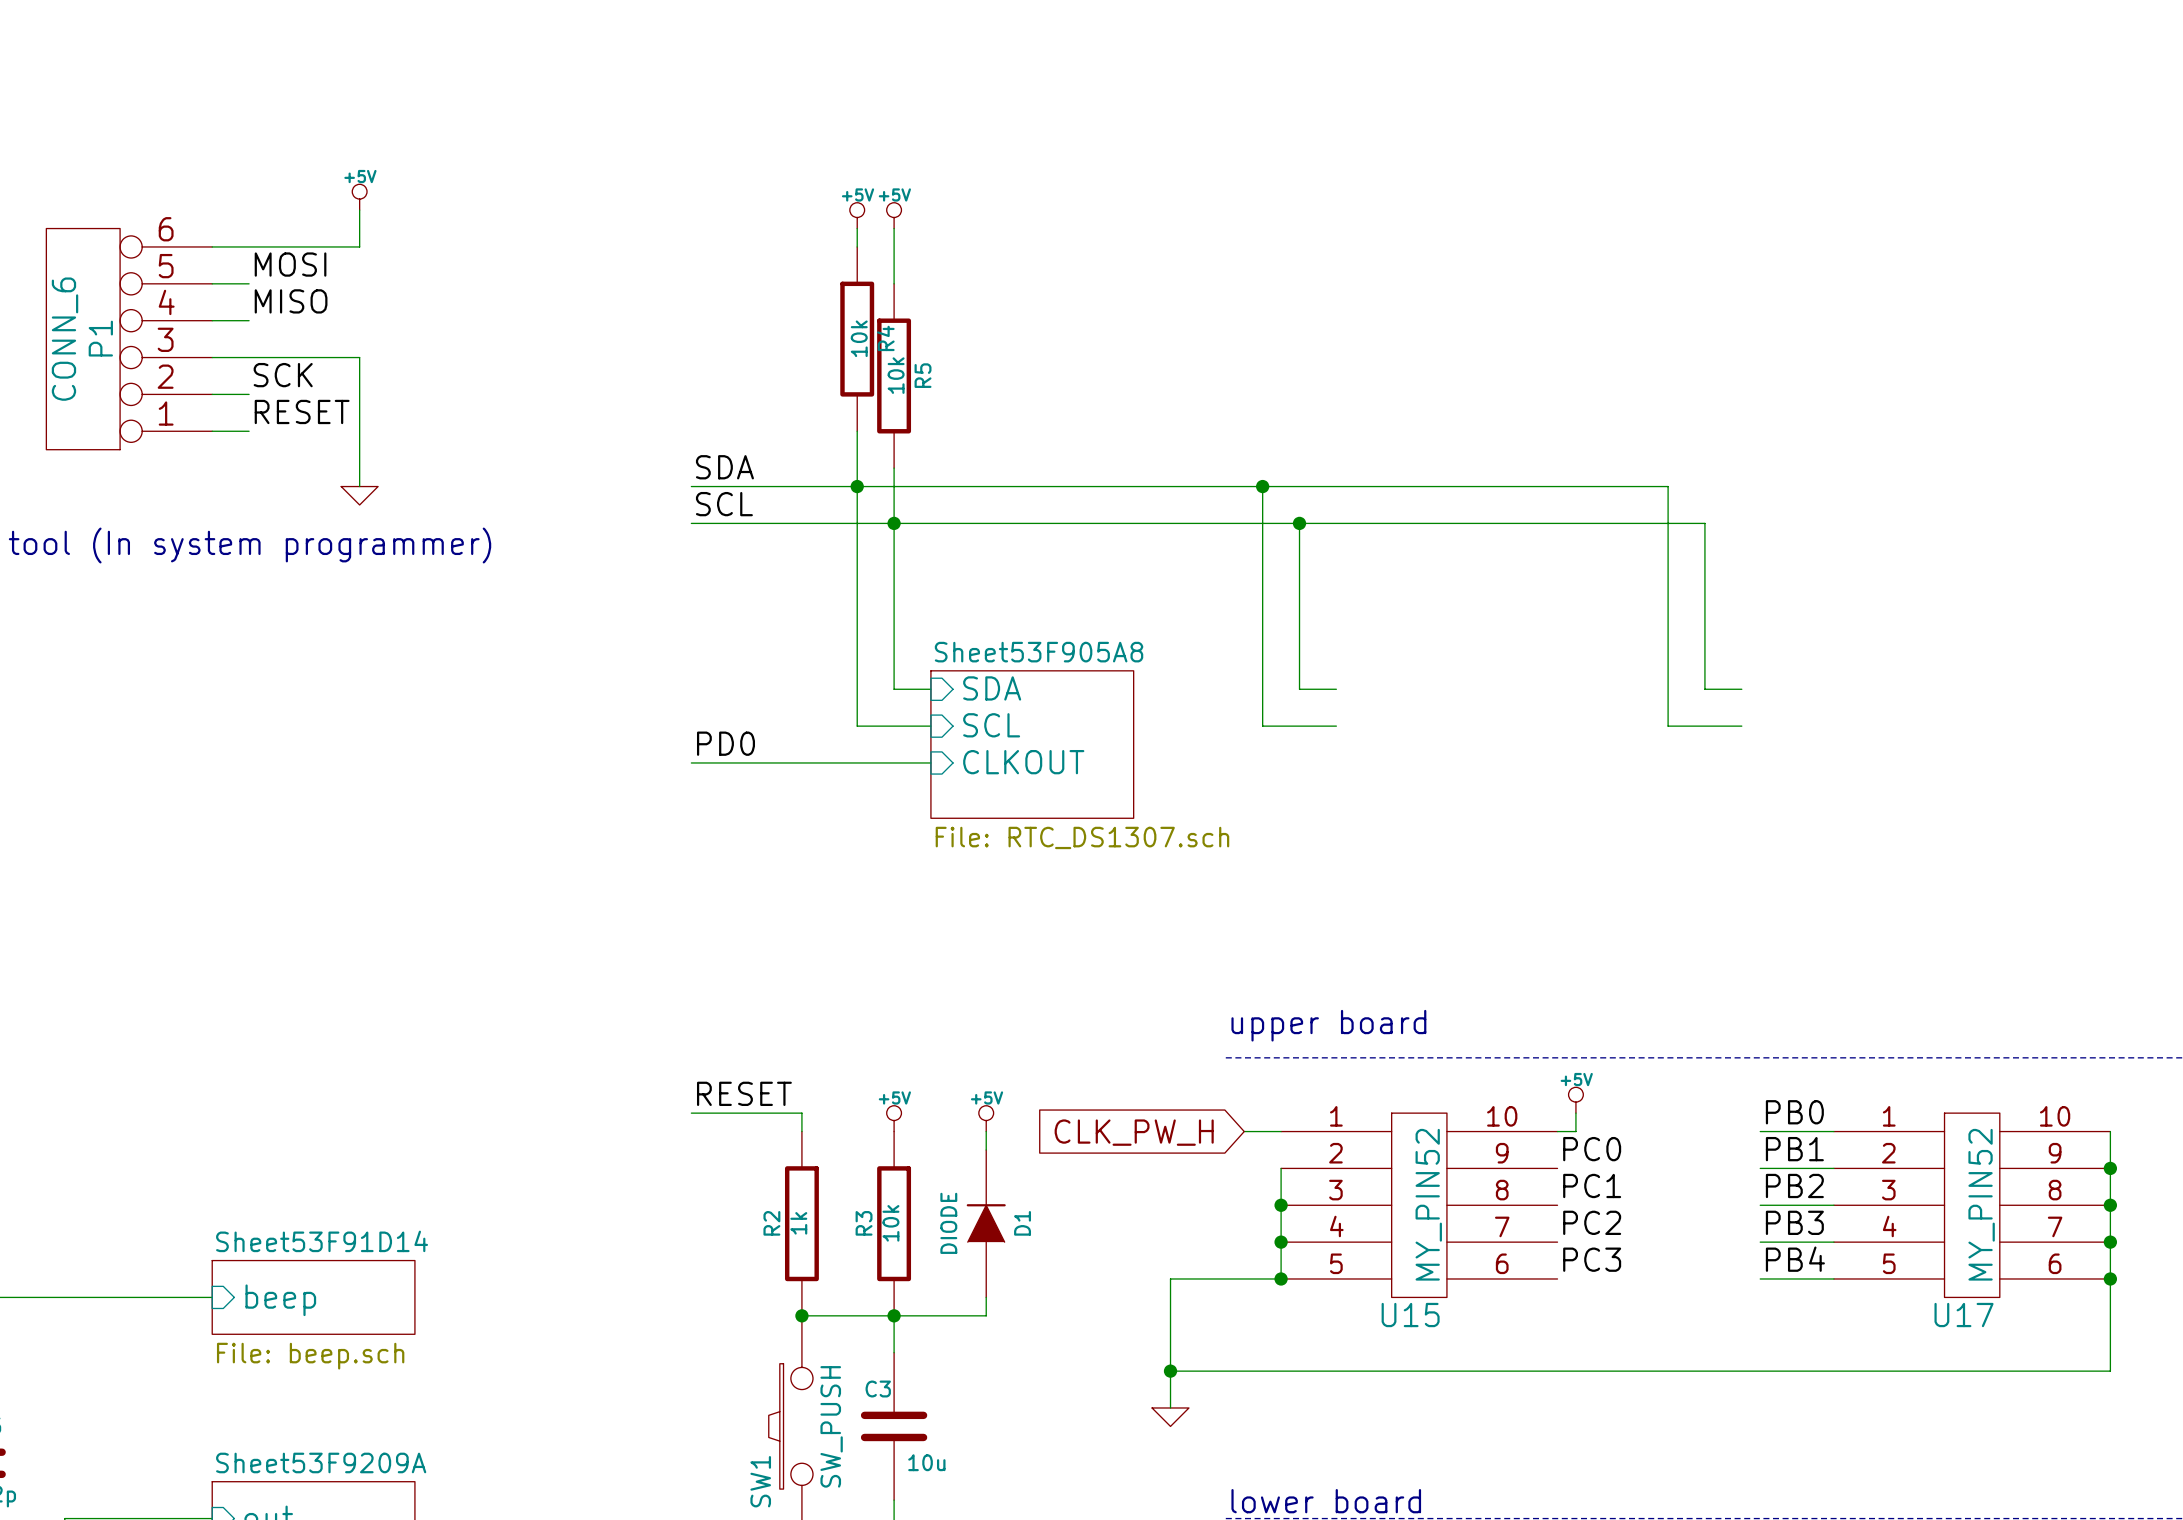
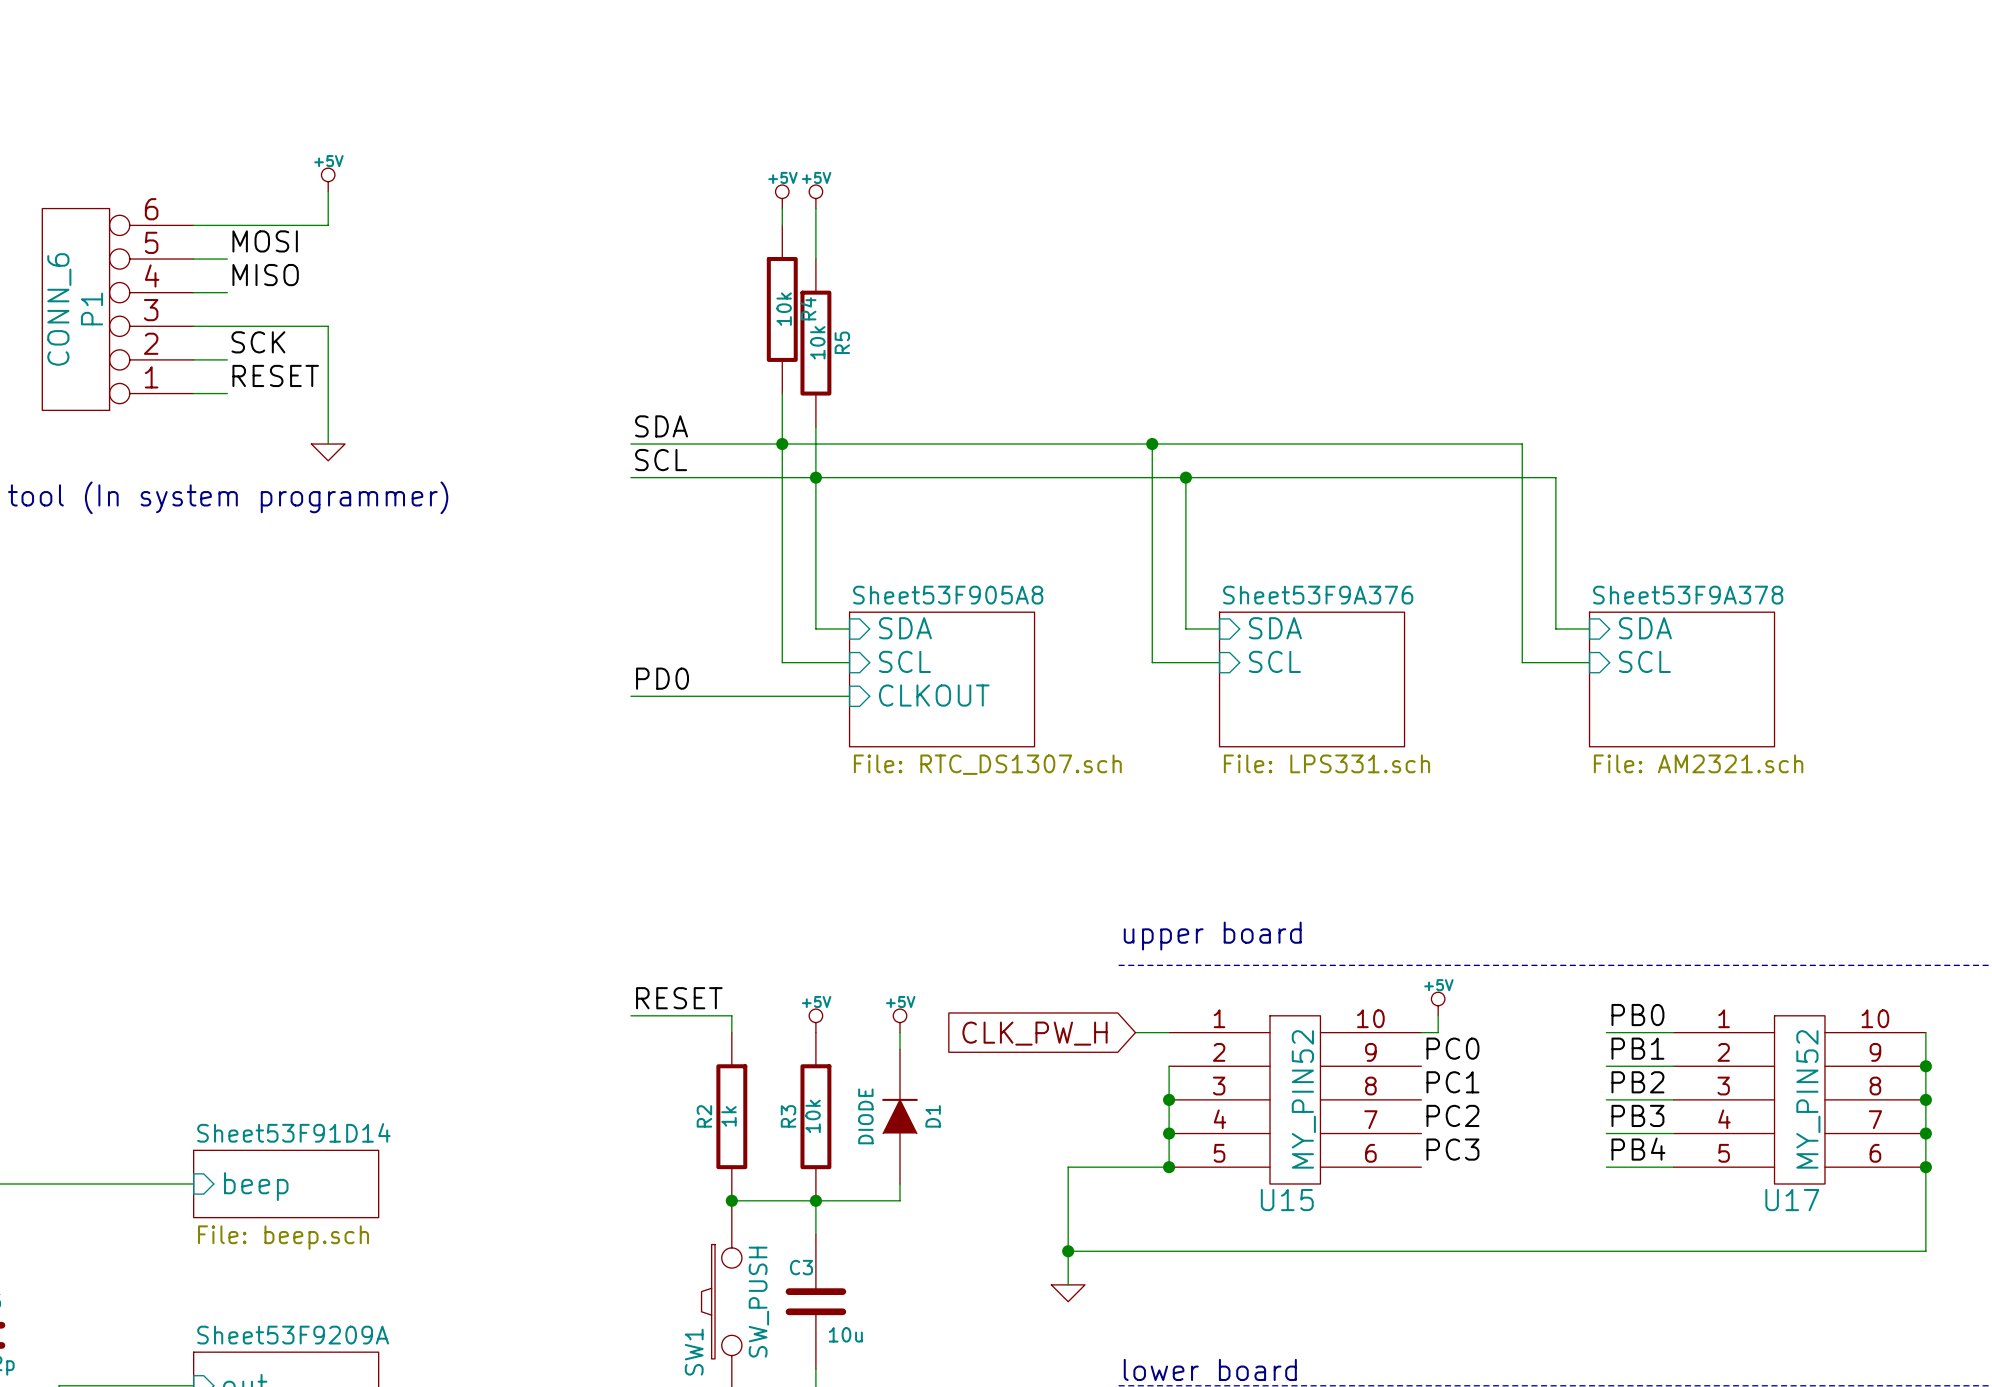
sheet pin: none -> SDA (1275, 628)
sheet pin: none -> SDA (1645, 628)
sheet pin: none -> SCL (1274, 661)
sheet pin: none -> SCL (1644, 661)
sheet Sheet53F9A376: none -> File: LPS331.sch (1312, 679)
sheet Sheet53F9A378: none -> File: AM2321.sch (1682, 679)

